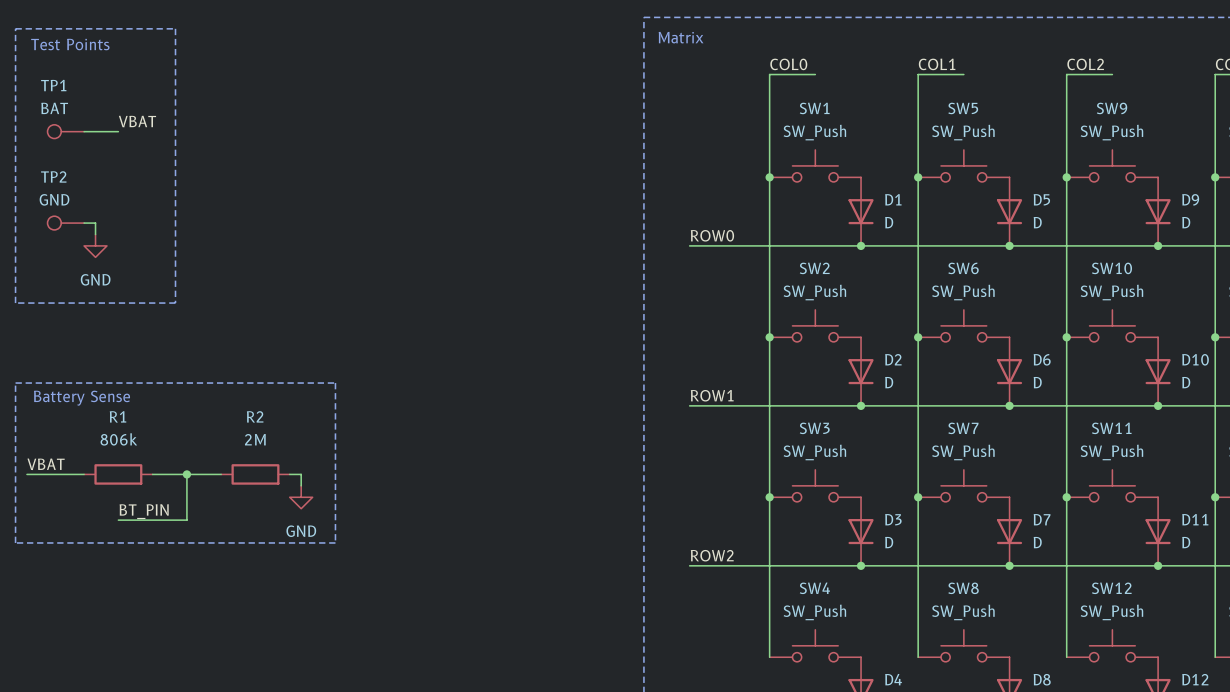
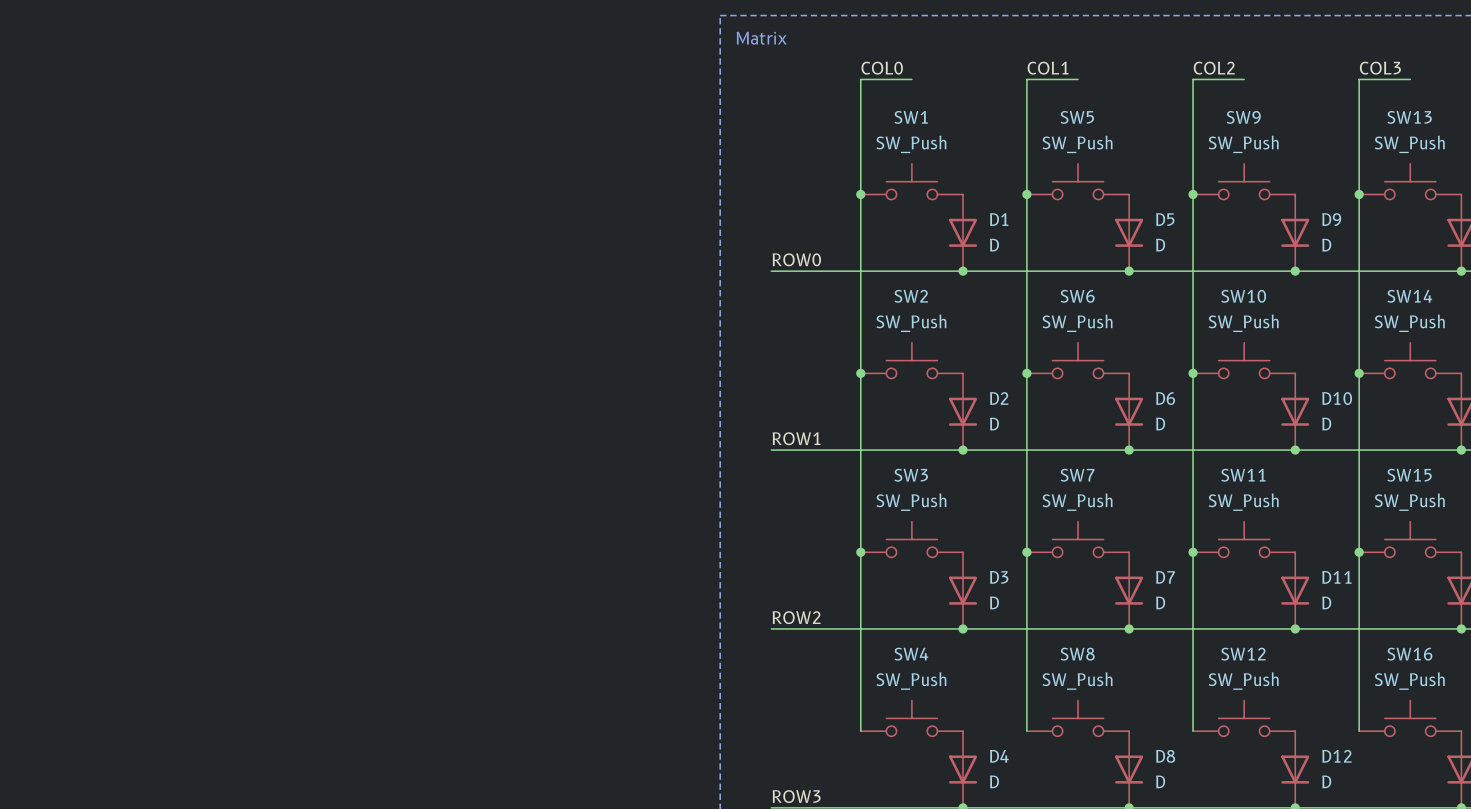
line: (15, 28) (15, 303) (175, 303) (175, 28) (15, 28) -> none
text: Test Points (70, 44) -> none
label: VBAT (137, 121) -> none
TP1: BAT (65, 131) -> none
wire: (84, 131) (118, 131) -> none
TP2: GND (65, 223) -> none
wire: (84, 223) (95, 223) (95, 234) -> none
power symbol: GND (95, 245) -> none
line: (15, 383) (335, 383) (335, 542) (15, 542) (15, 383) -> none
text: Battery Sense (82, 398) -> none
label: VBAT (46, 464) -> none
wire: (26, 474) (84, 474) -> none
R1: 806k (118, 474) -> none
wire: (152, 474) (221, 474) -> none
wire: (186, 474) (186, 520) (118, 520) -> none
junction: (186, 474) -> none
R2: 2M (255, 474) -> none
wire: (289, 474) (301, 474) (301, 485) -> none
power symbol: GND (301, 497) -> none
label: BT_PIN (144, 511) -> none

